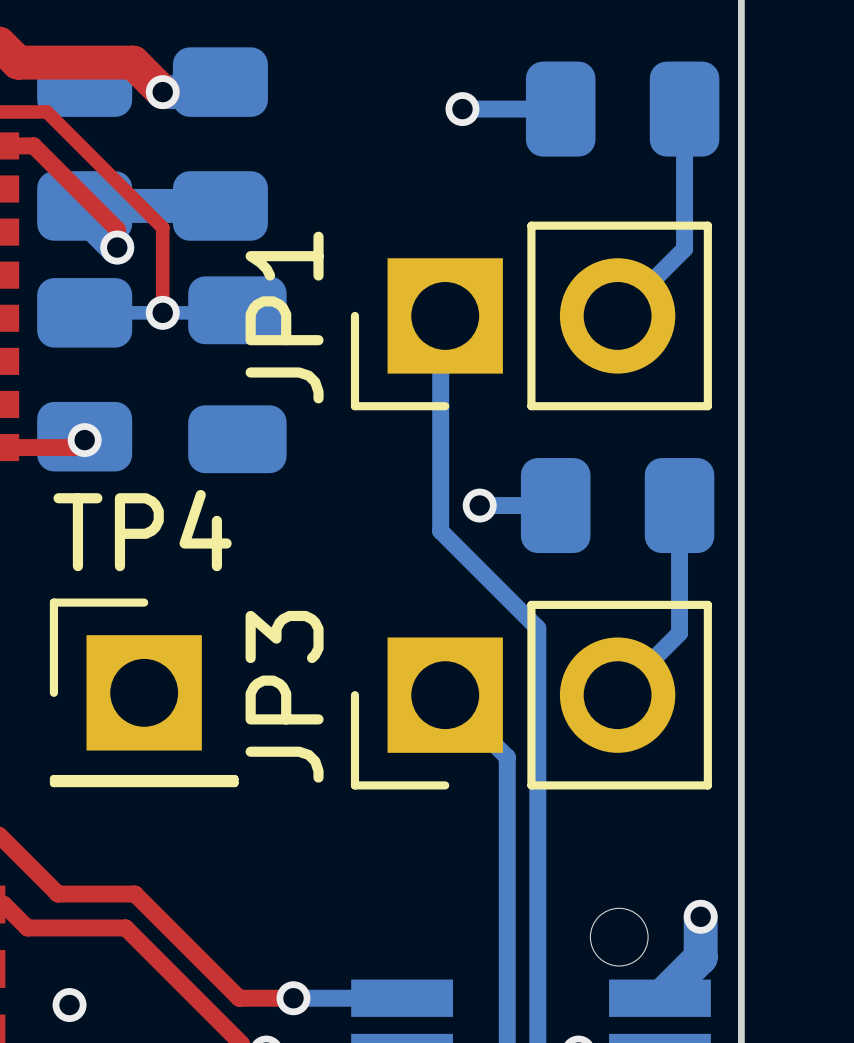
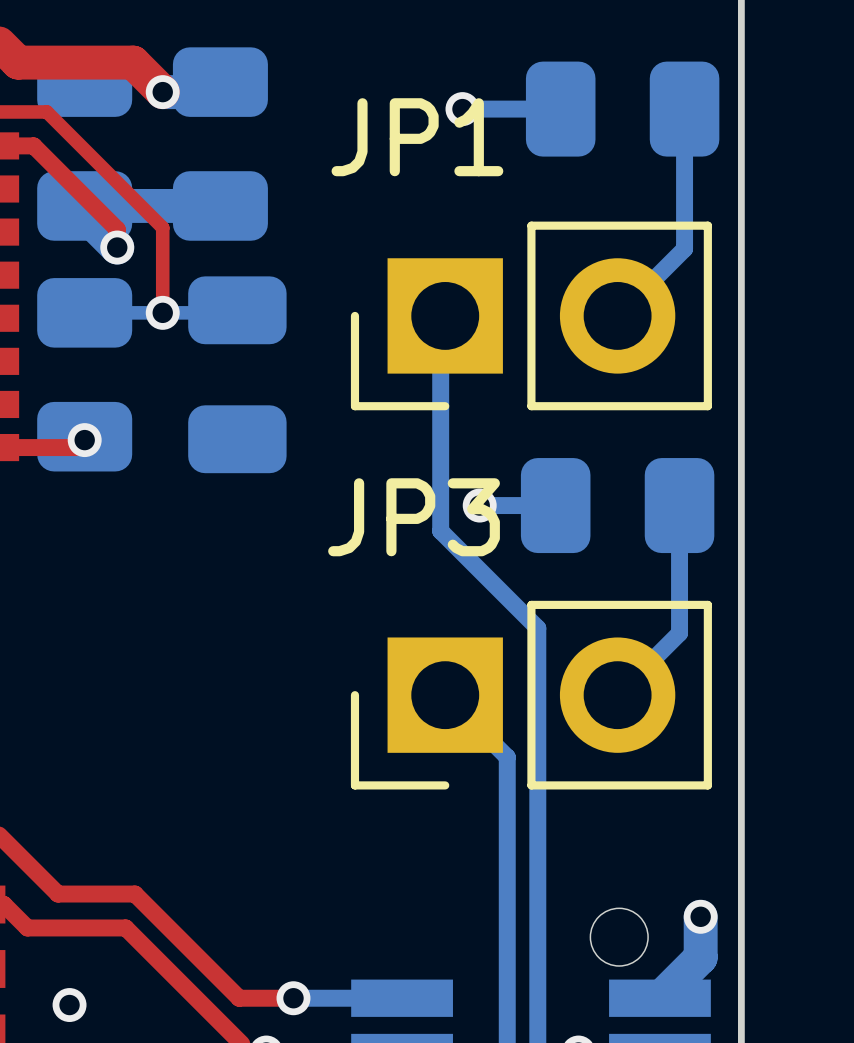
JP1 name rotation: 0° (284, 317) -> 90° clockwise (417, 137)
TP4: (144, 692) -> none
JP3 name rotation: 0° (284, 696) -> 90° clockwise (414, 517)

